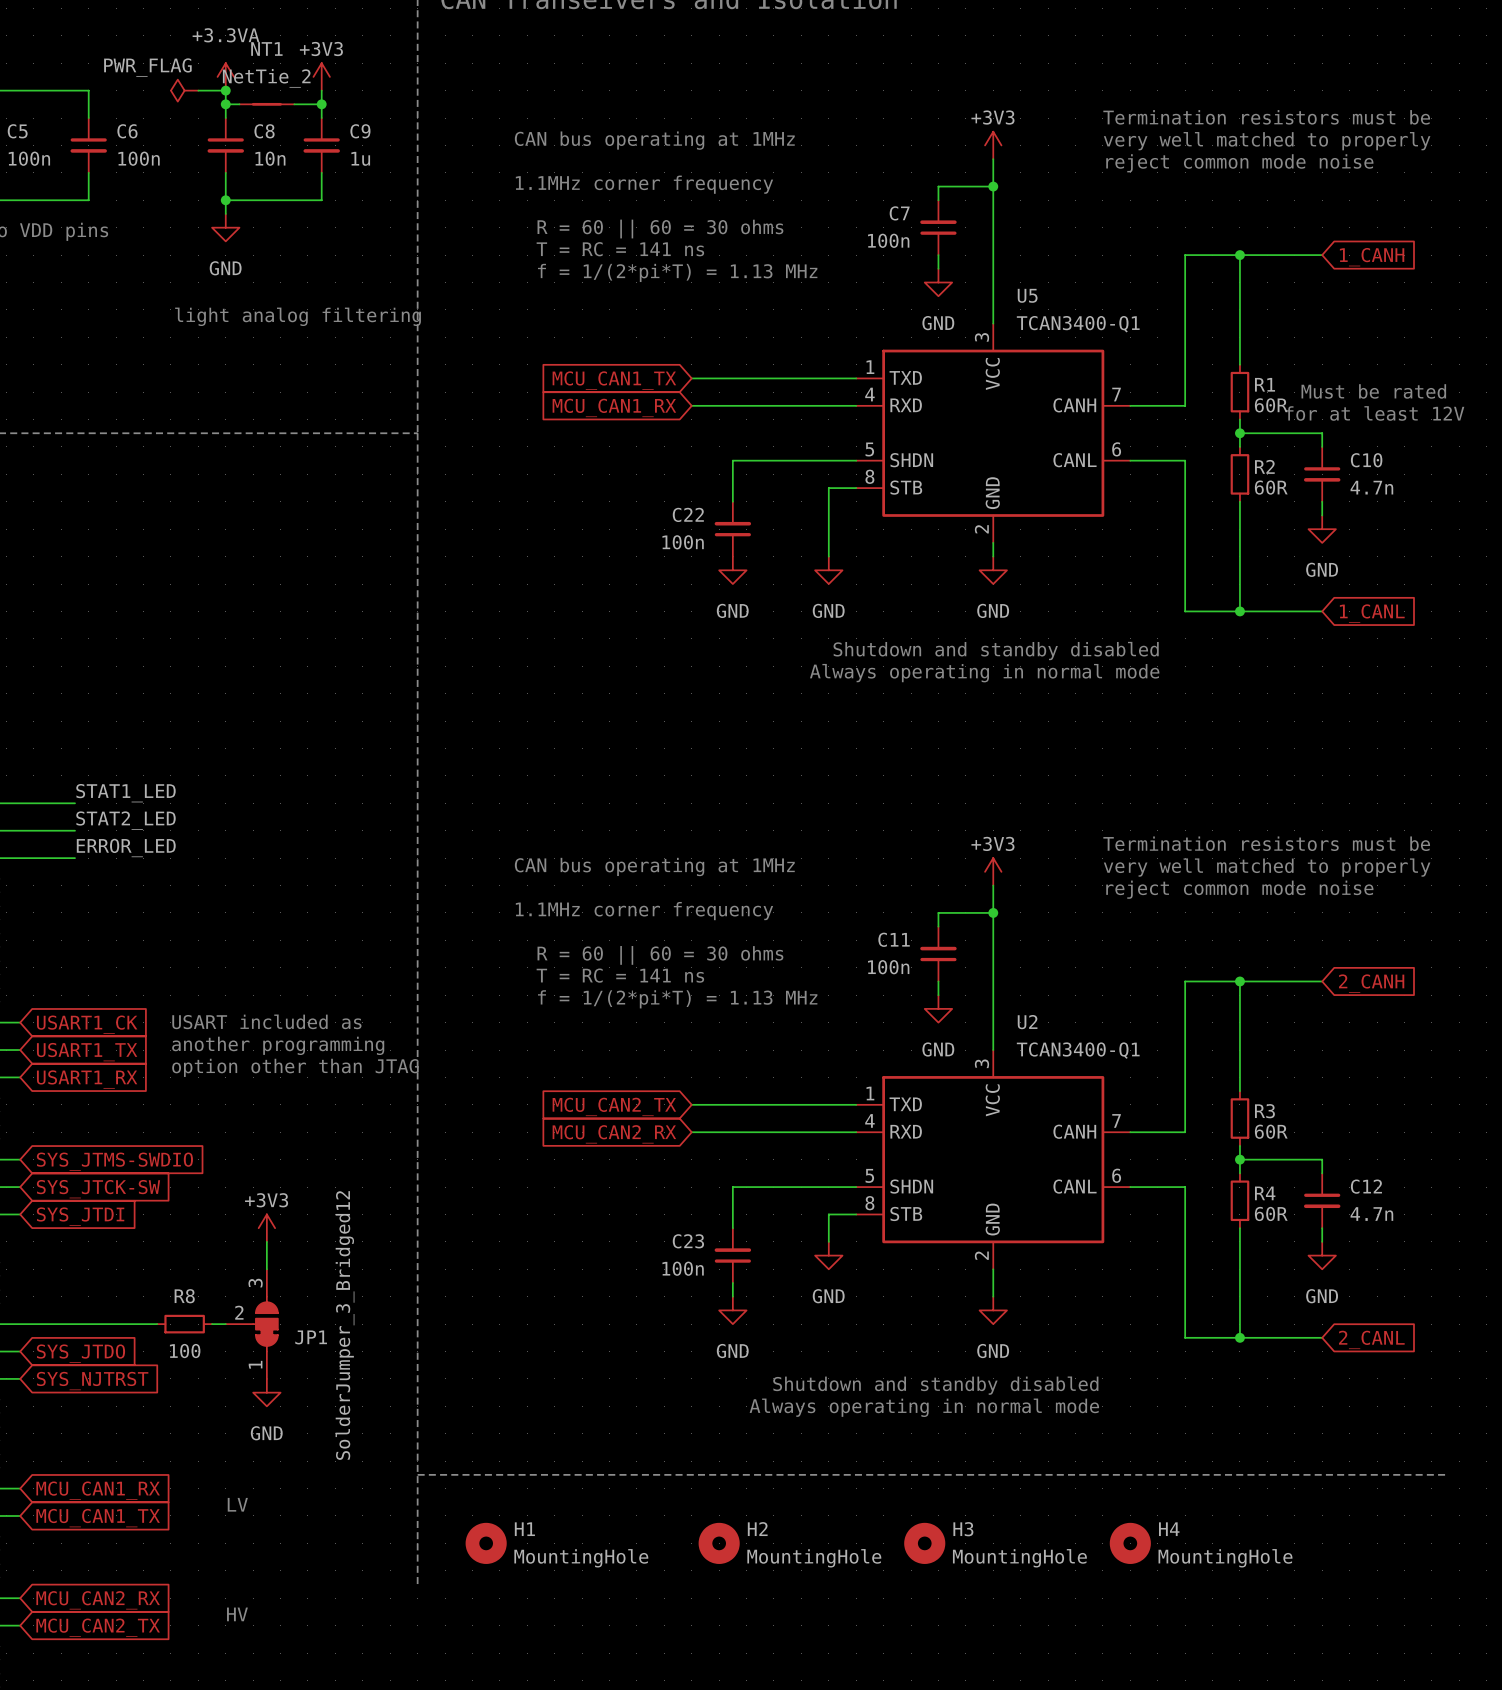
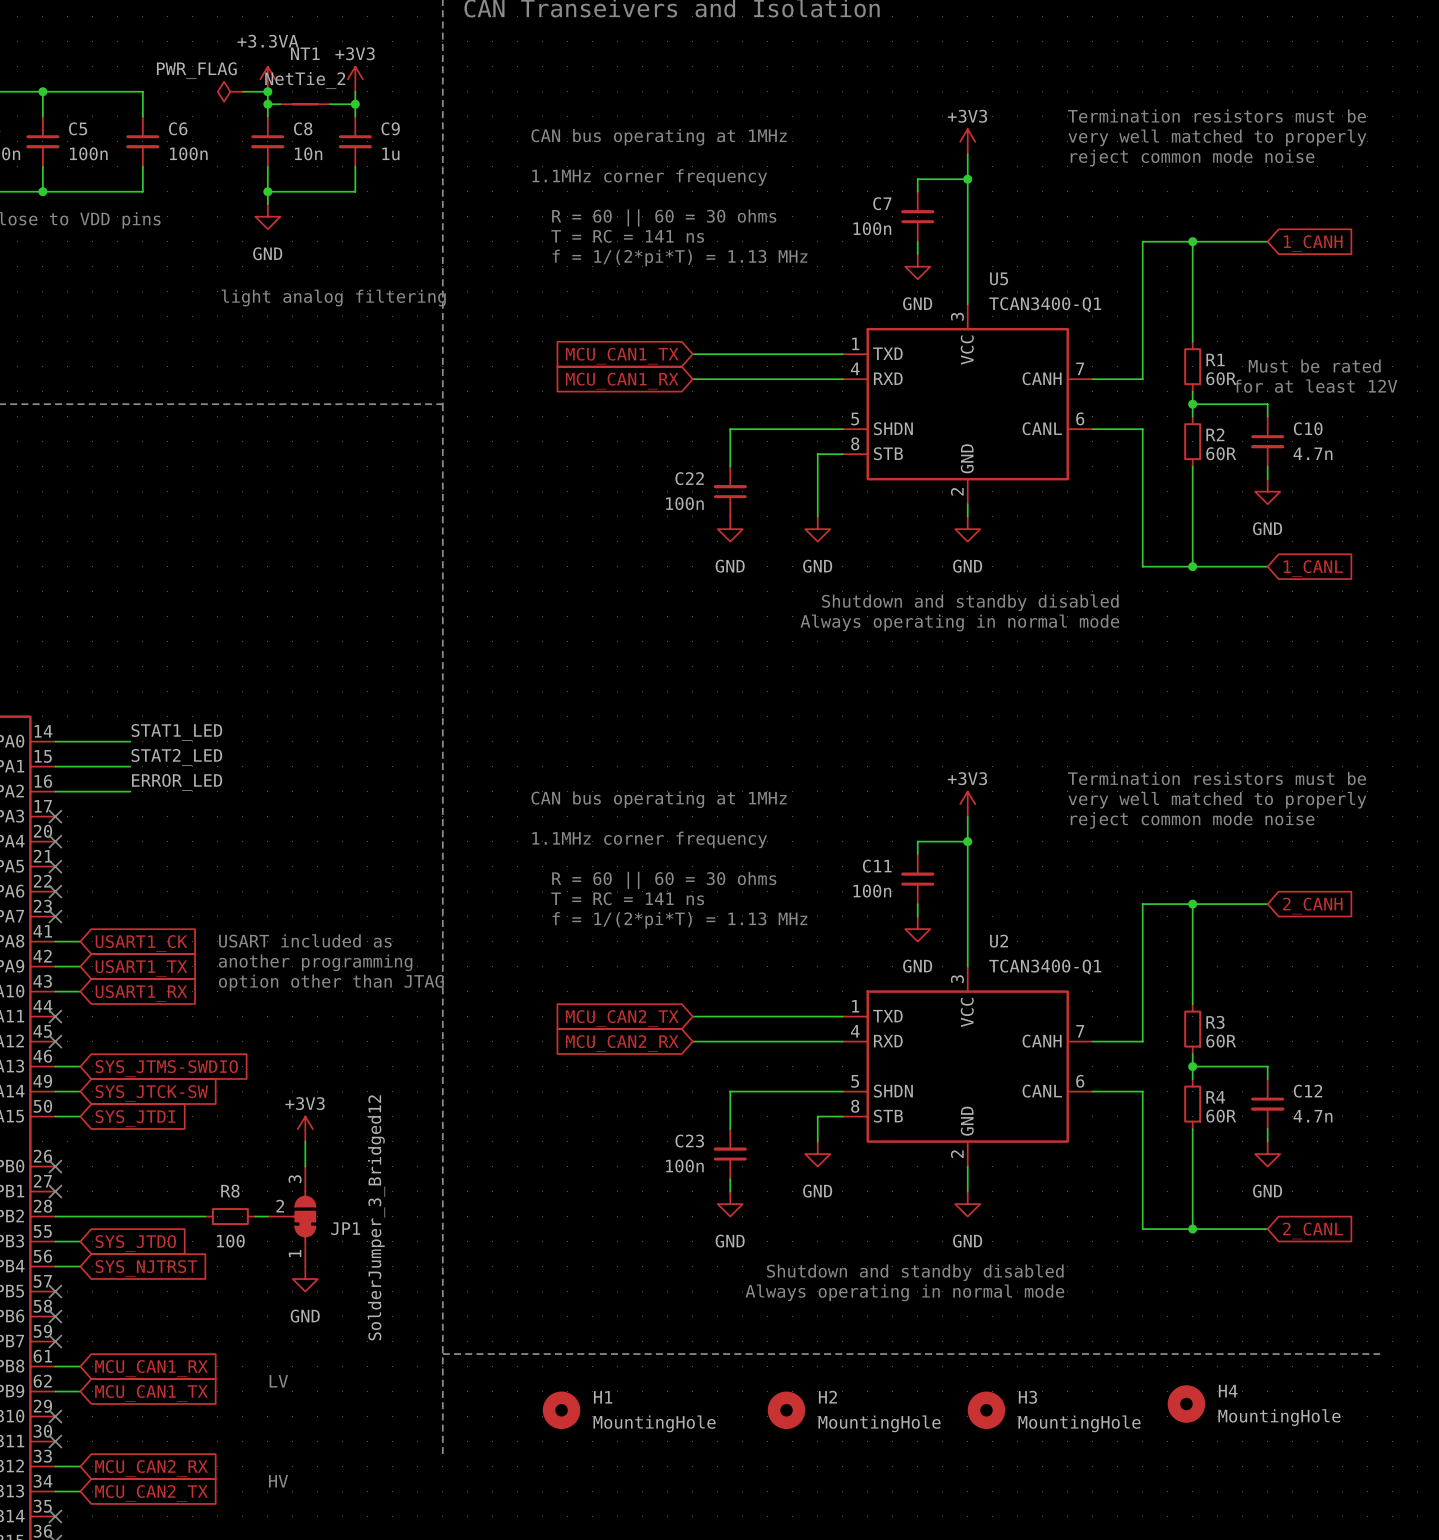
H1 name position: H1 (524, 1529) -> H1 (603, 1397)
H2 name position: H2 (757, 1529) -> H2 (827, 1397)
H3 name position: H3 (963, 1529) -> H3 (1027, 1397)
H4 name position: H4 (1169, 1529) -> H4 (1228, 1391)
H1 position: (486, 1543) -> (561, 1410)
H2 position: (719, 1543) -> (786, 1410)
H3 position: (924, 1543) -> (986, 1410)
H4 position: (1130, 1543) -> (1186, 1404)
H1 value position: MountingHole (581, 1558) -> MountingHole (654, 1423)
H2 value position: MountingHole (814, 1558) -> MountingHole (879, 1423)
H3 value position: MountingHole (1019, 1558) -> MountingHole (1079, 1423)
H4 value position: MountingHole (1225, 1558) -> MountingHole (1279, 1417)

